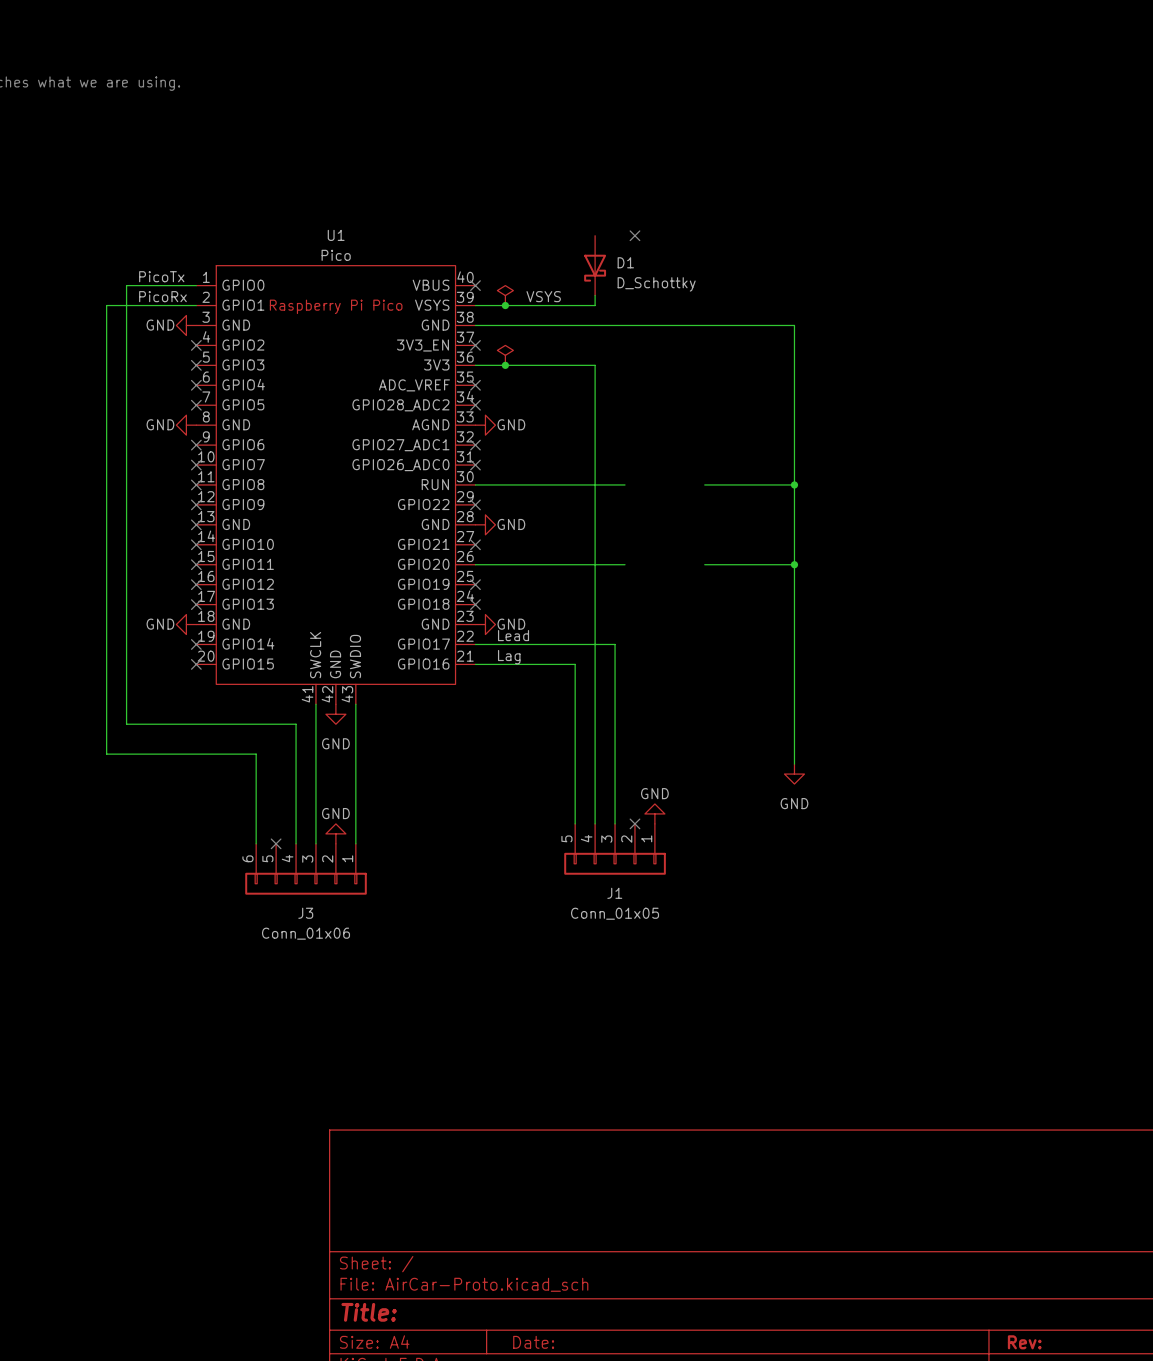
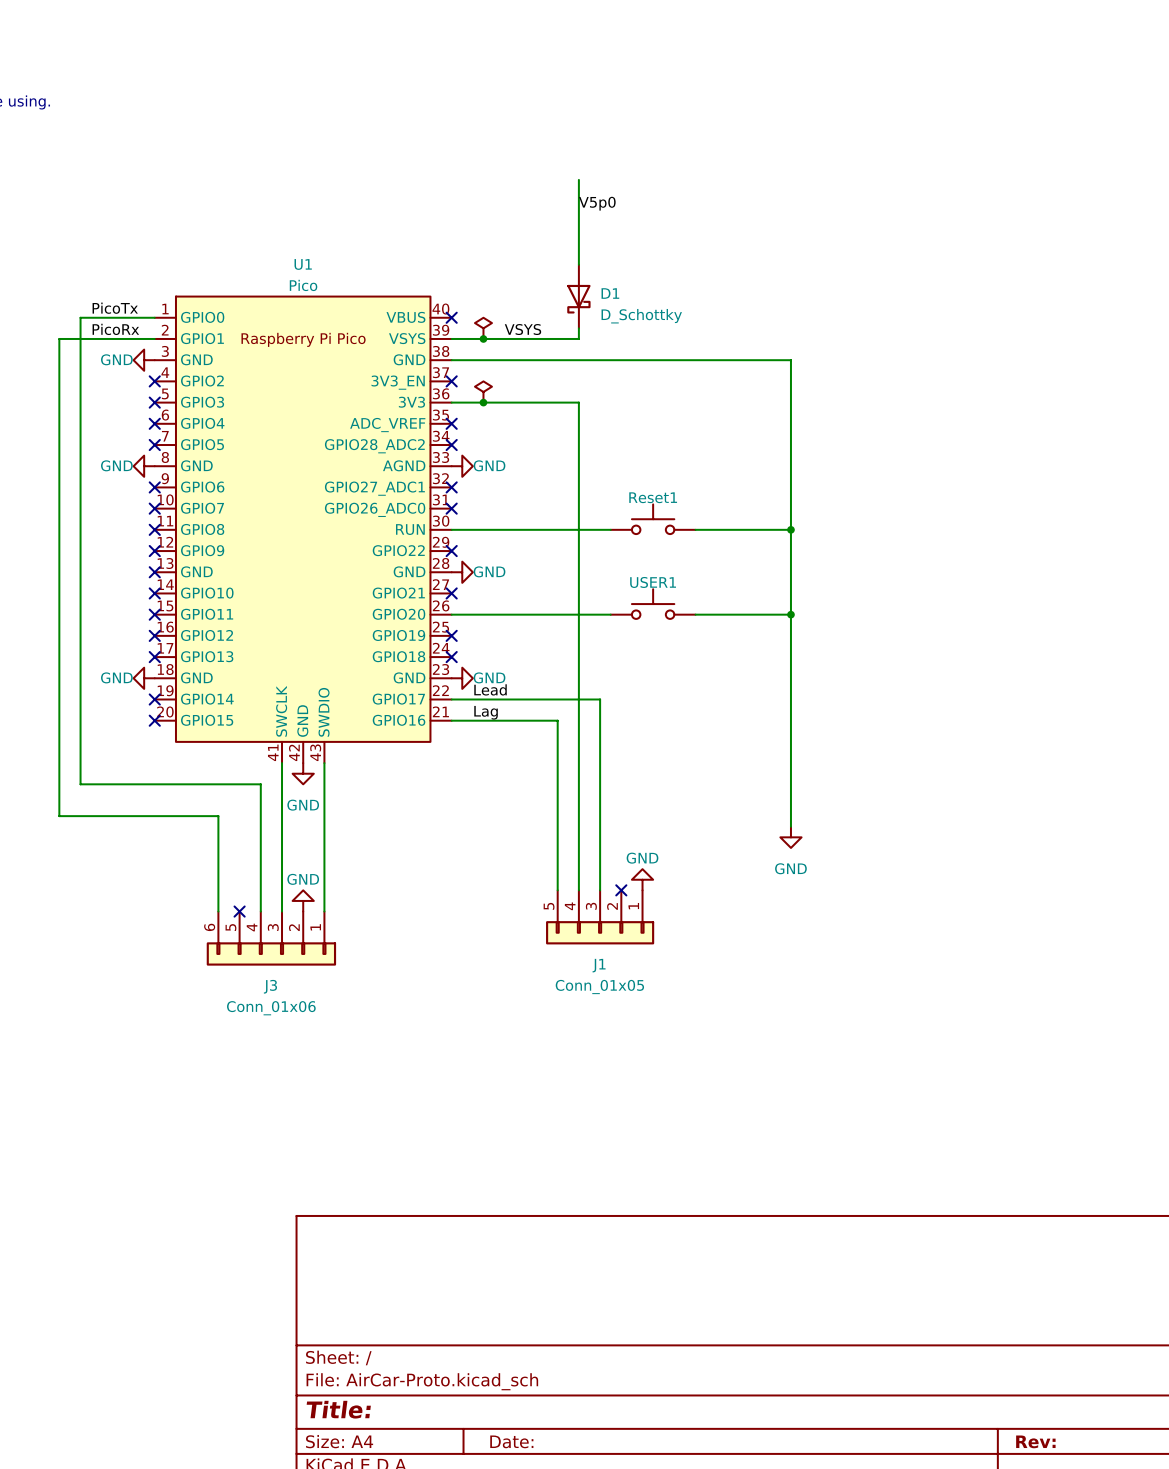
wire: none -> (578, 179) (578, 264)
label: none -> V5p0 (597, 203)
no-connect mark: (634, 235) -> none
Reset1: none -> (653, 519)
USER1: none -> (653, 604)

